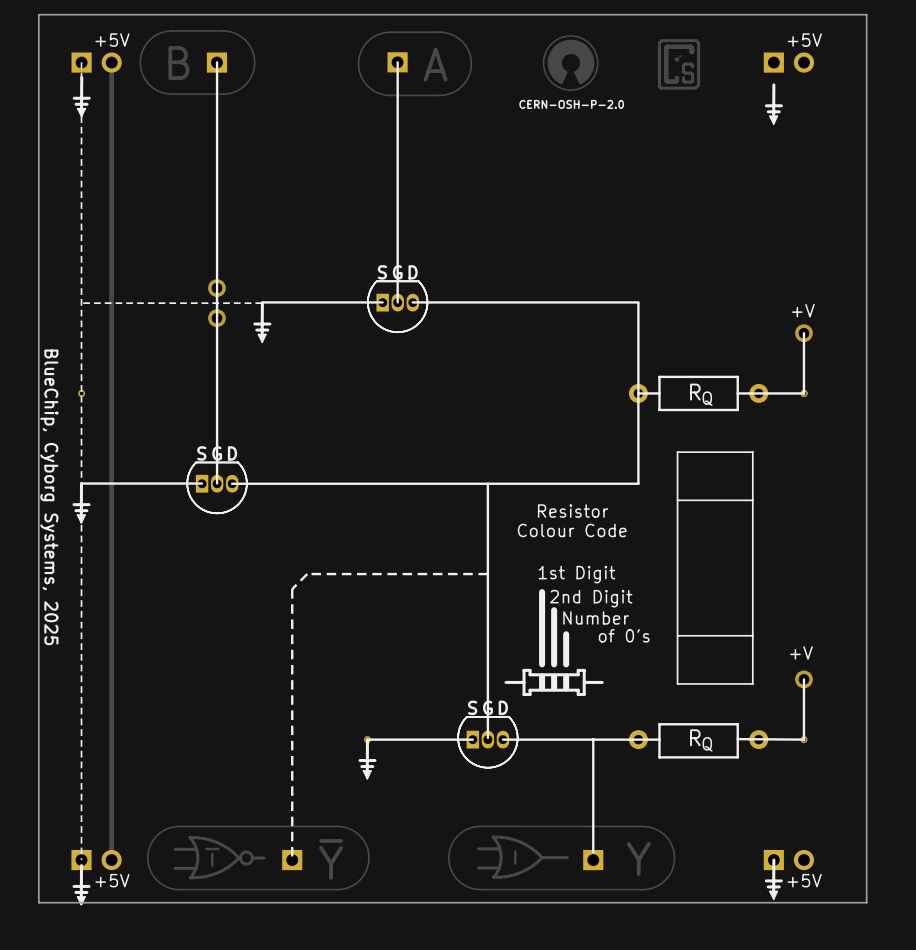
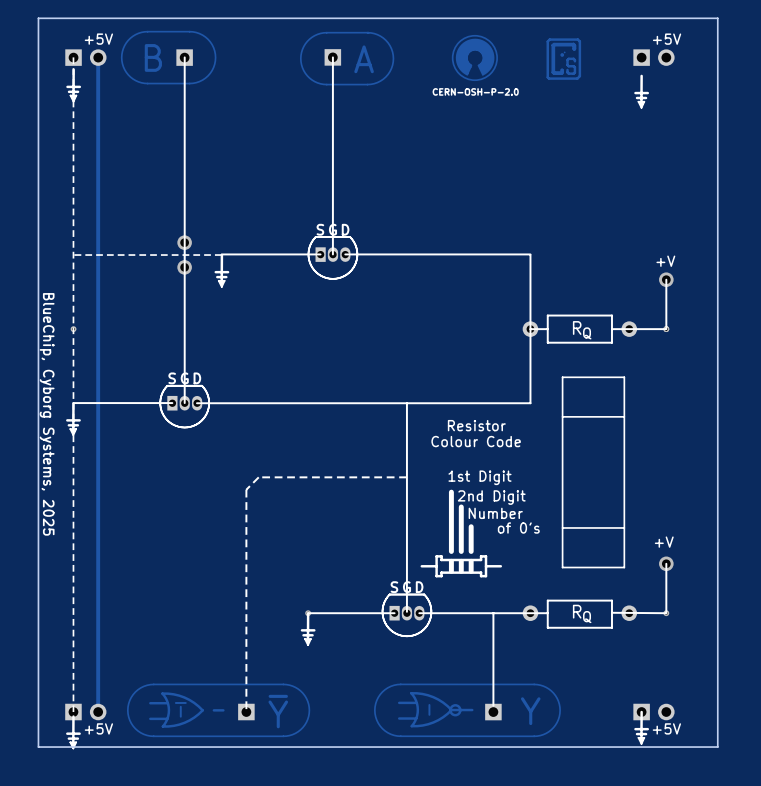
drawing: [238, 850, 254, 866] -> none
drawing: none -> [449, 704, 462, 717]

